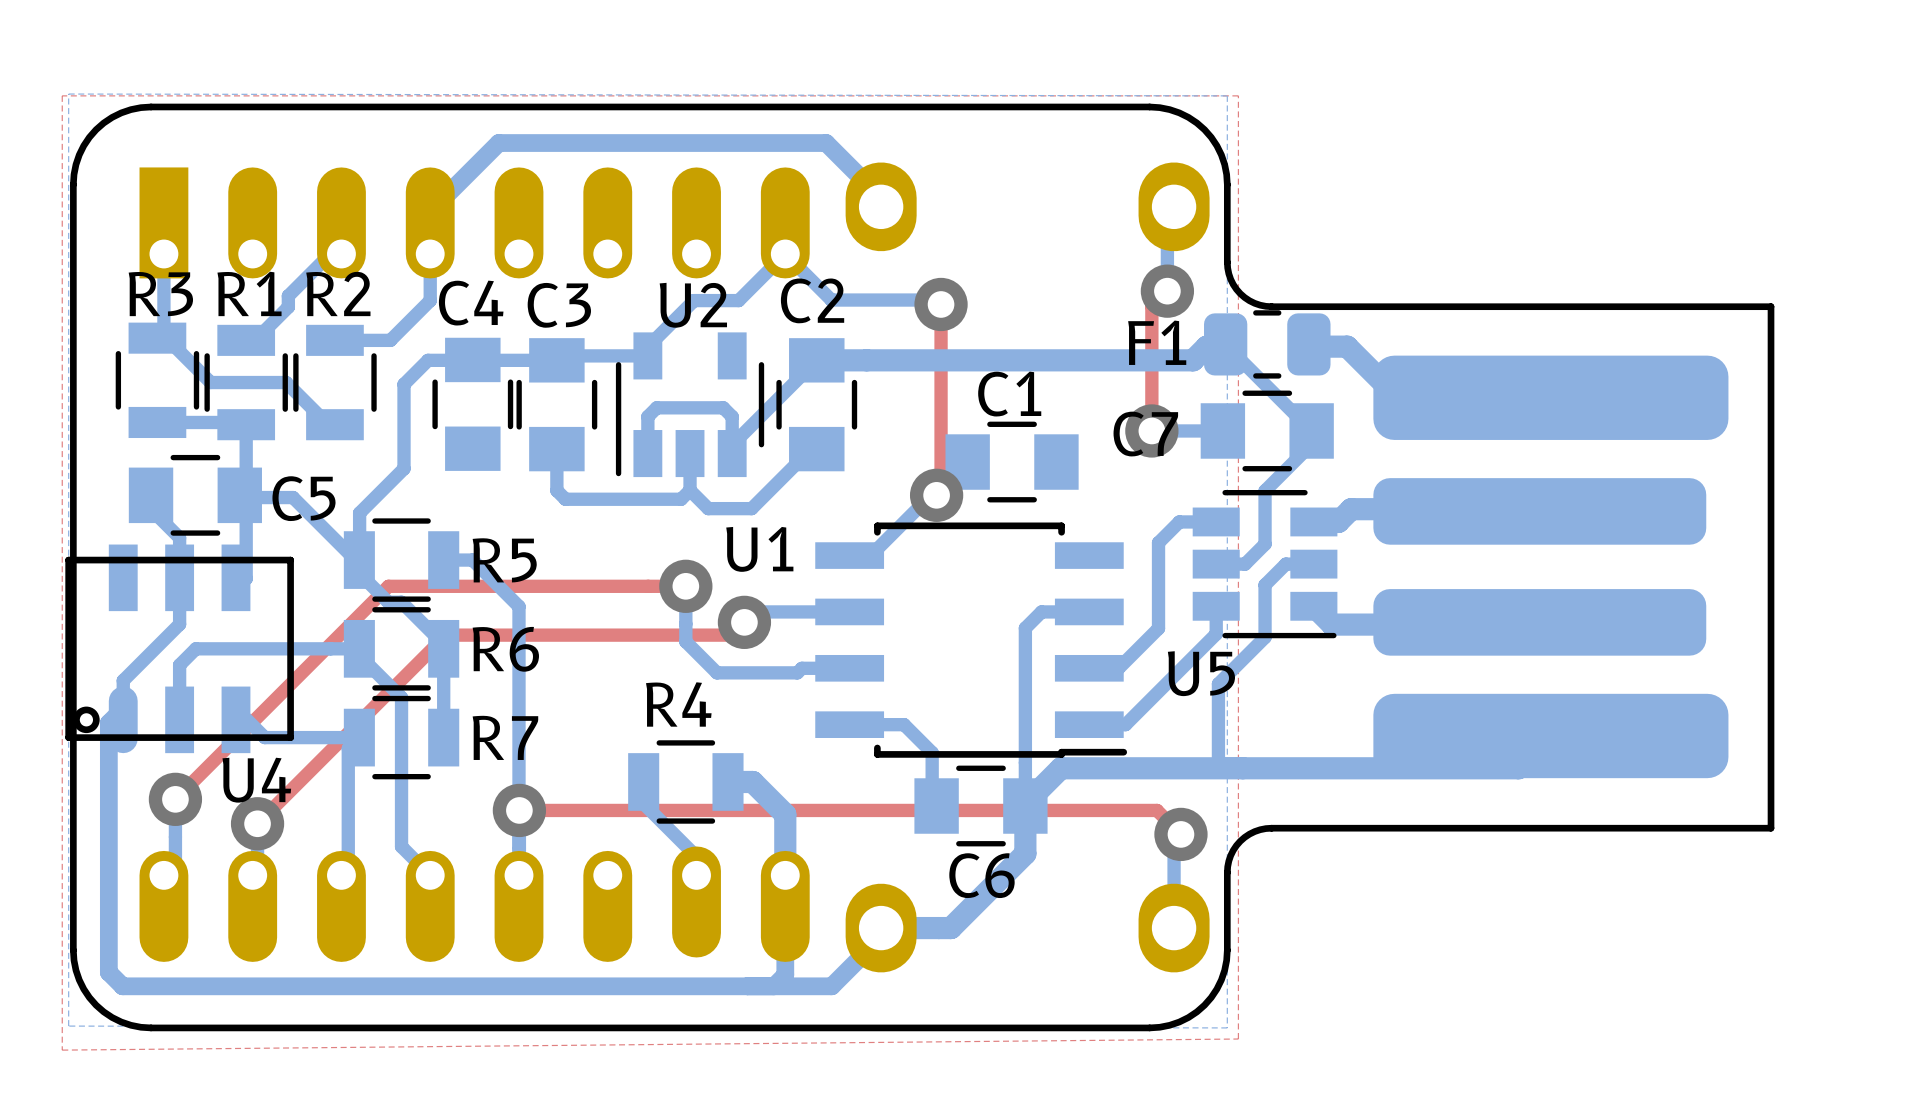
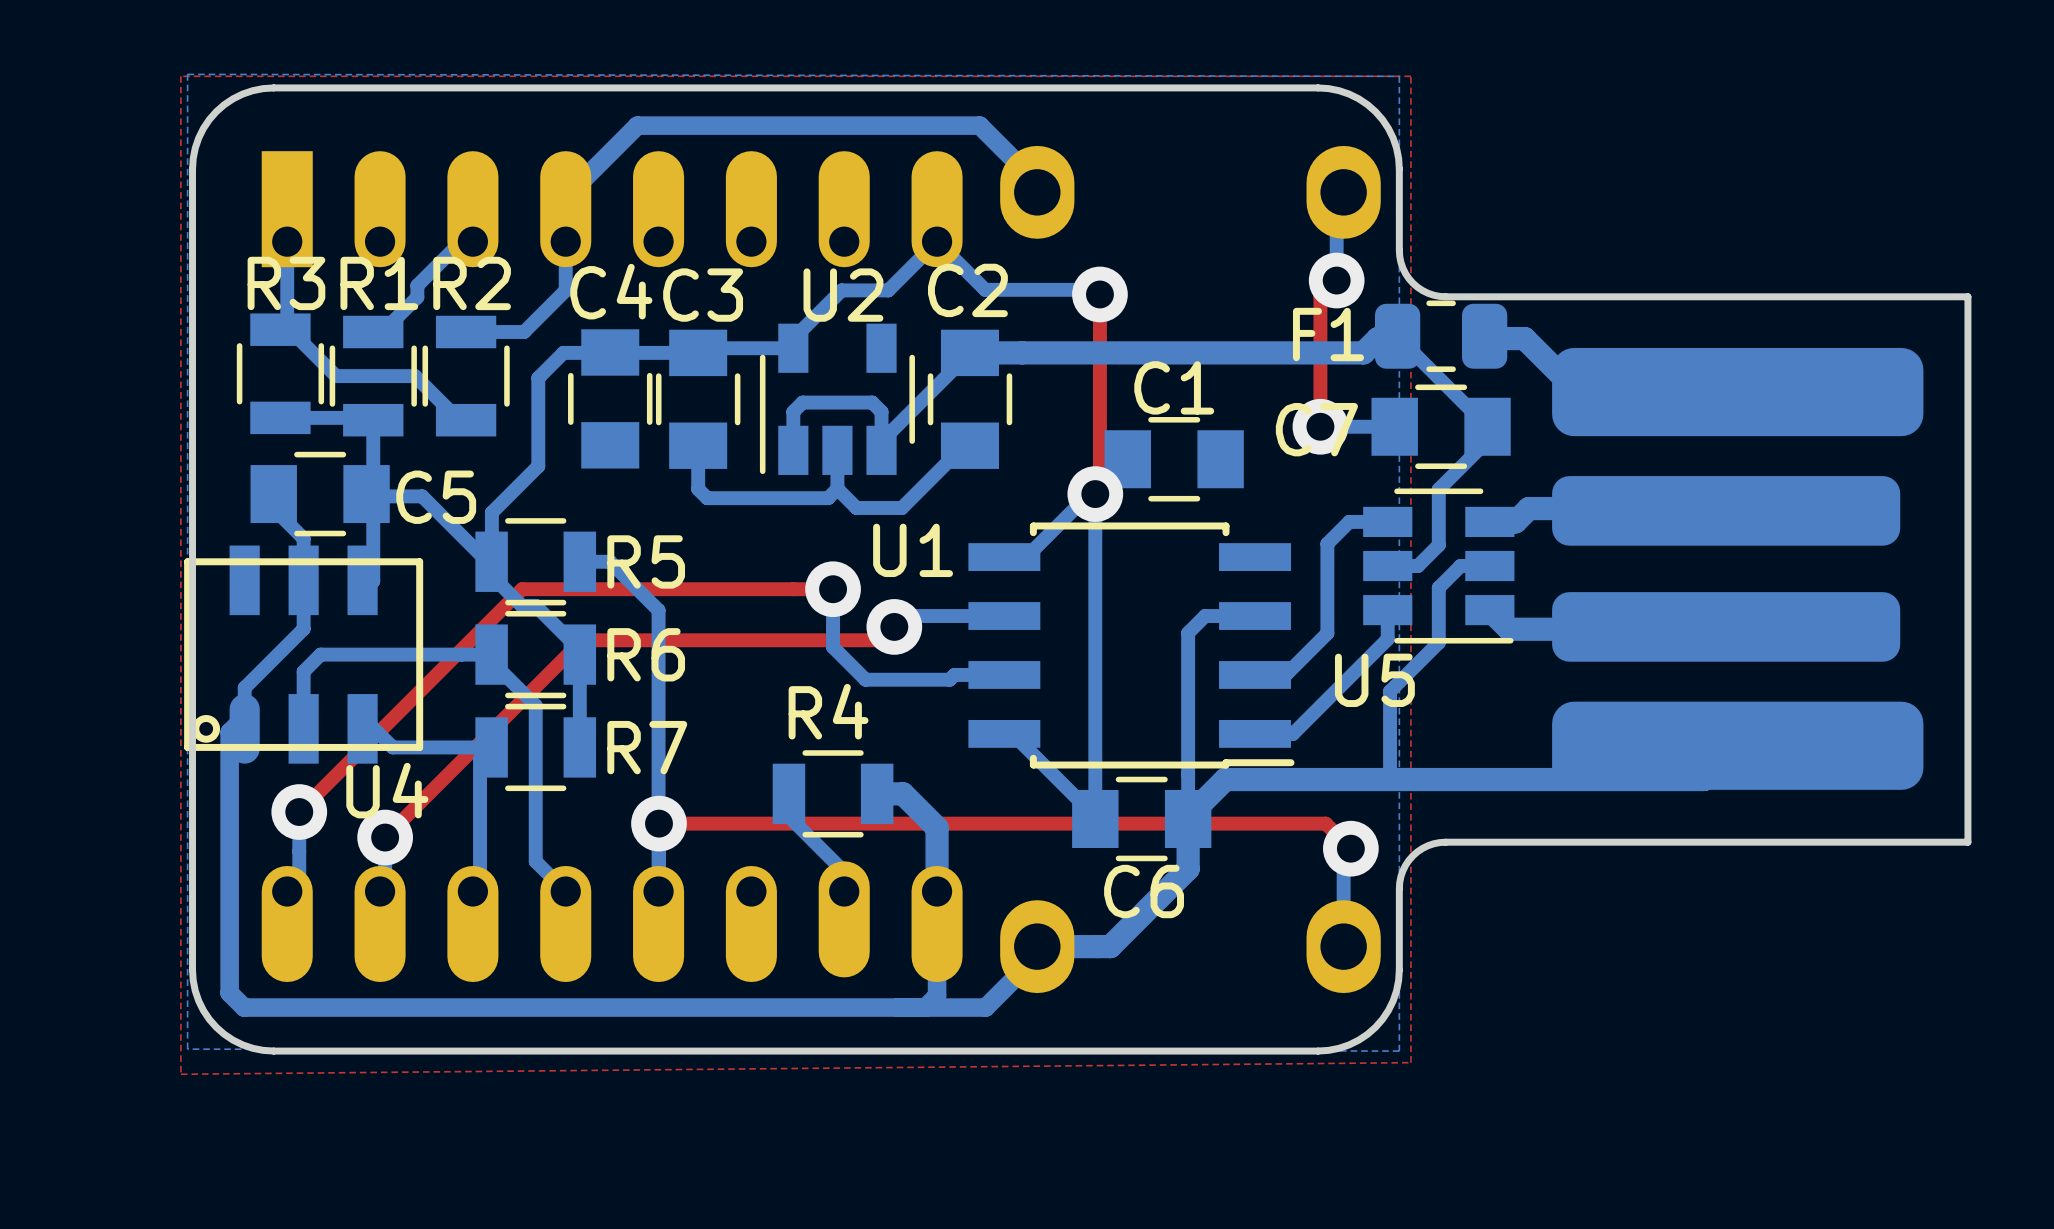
bottom track: none -> (1095, 494) (1095, 818)
bottom track: (857, 724) (904, 724) (932, 752) (932, 799) -> (1012, 733) (1090, 812)

